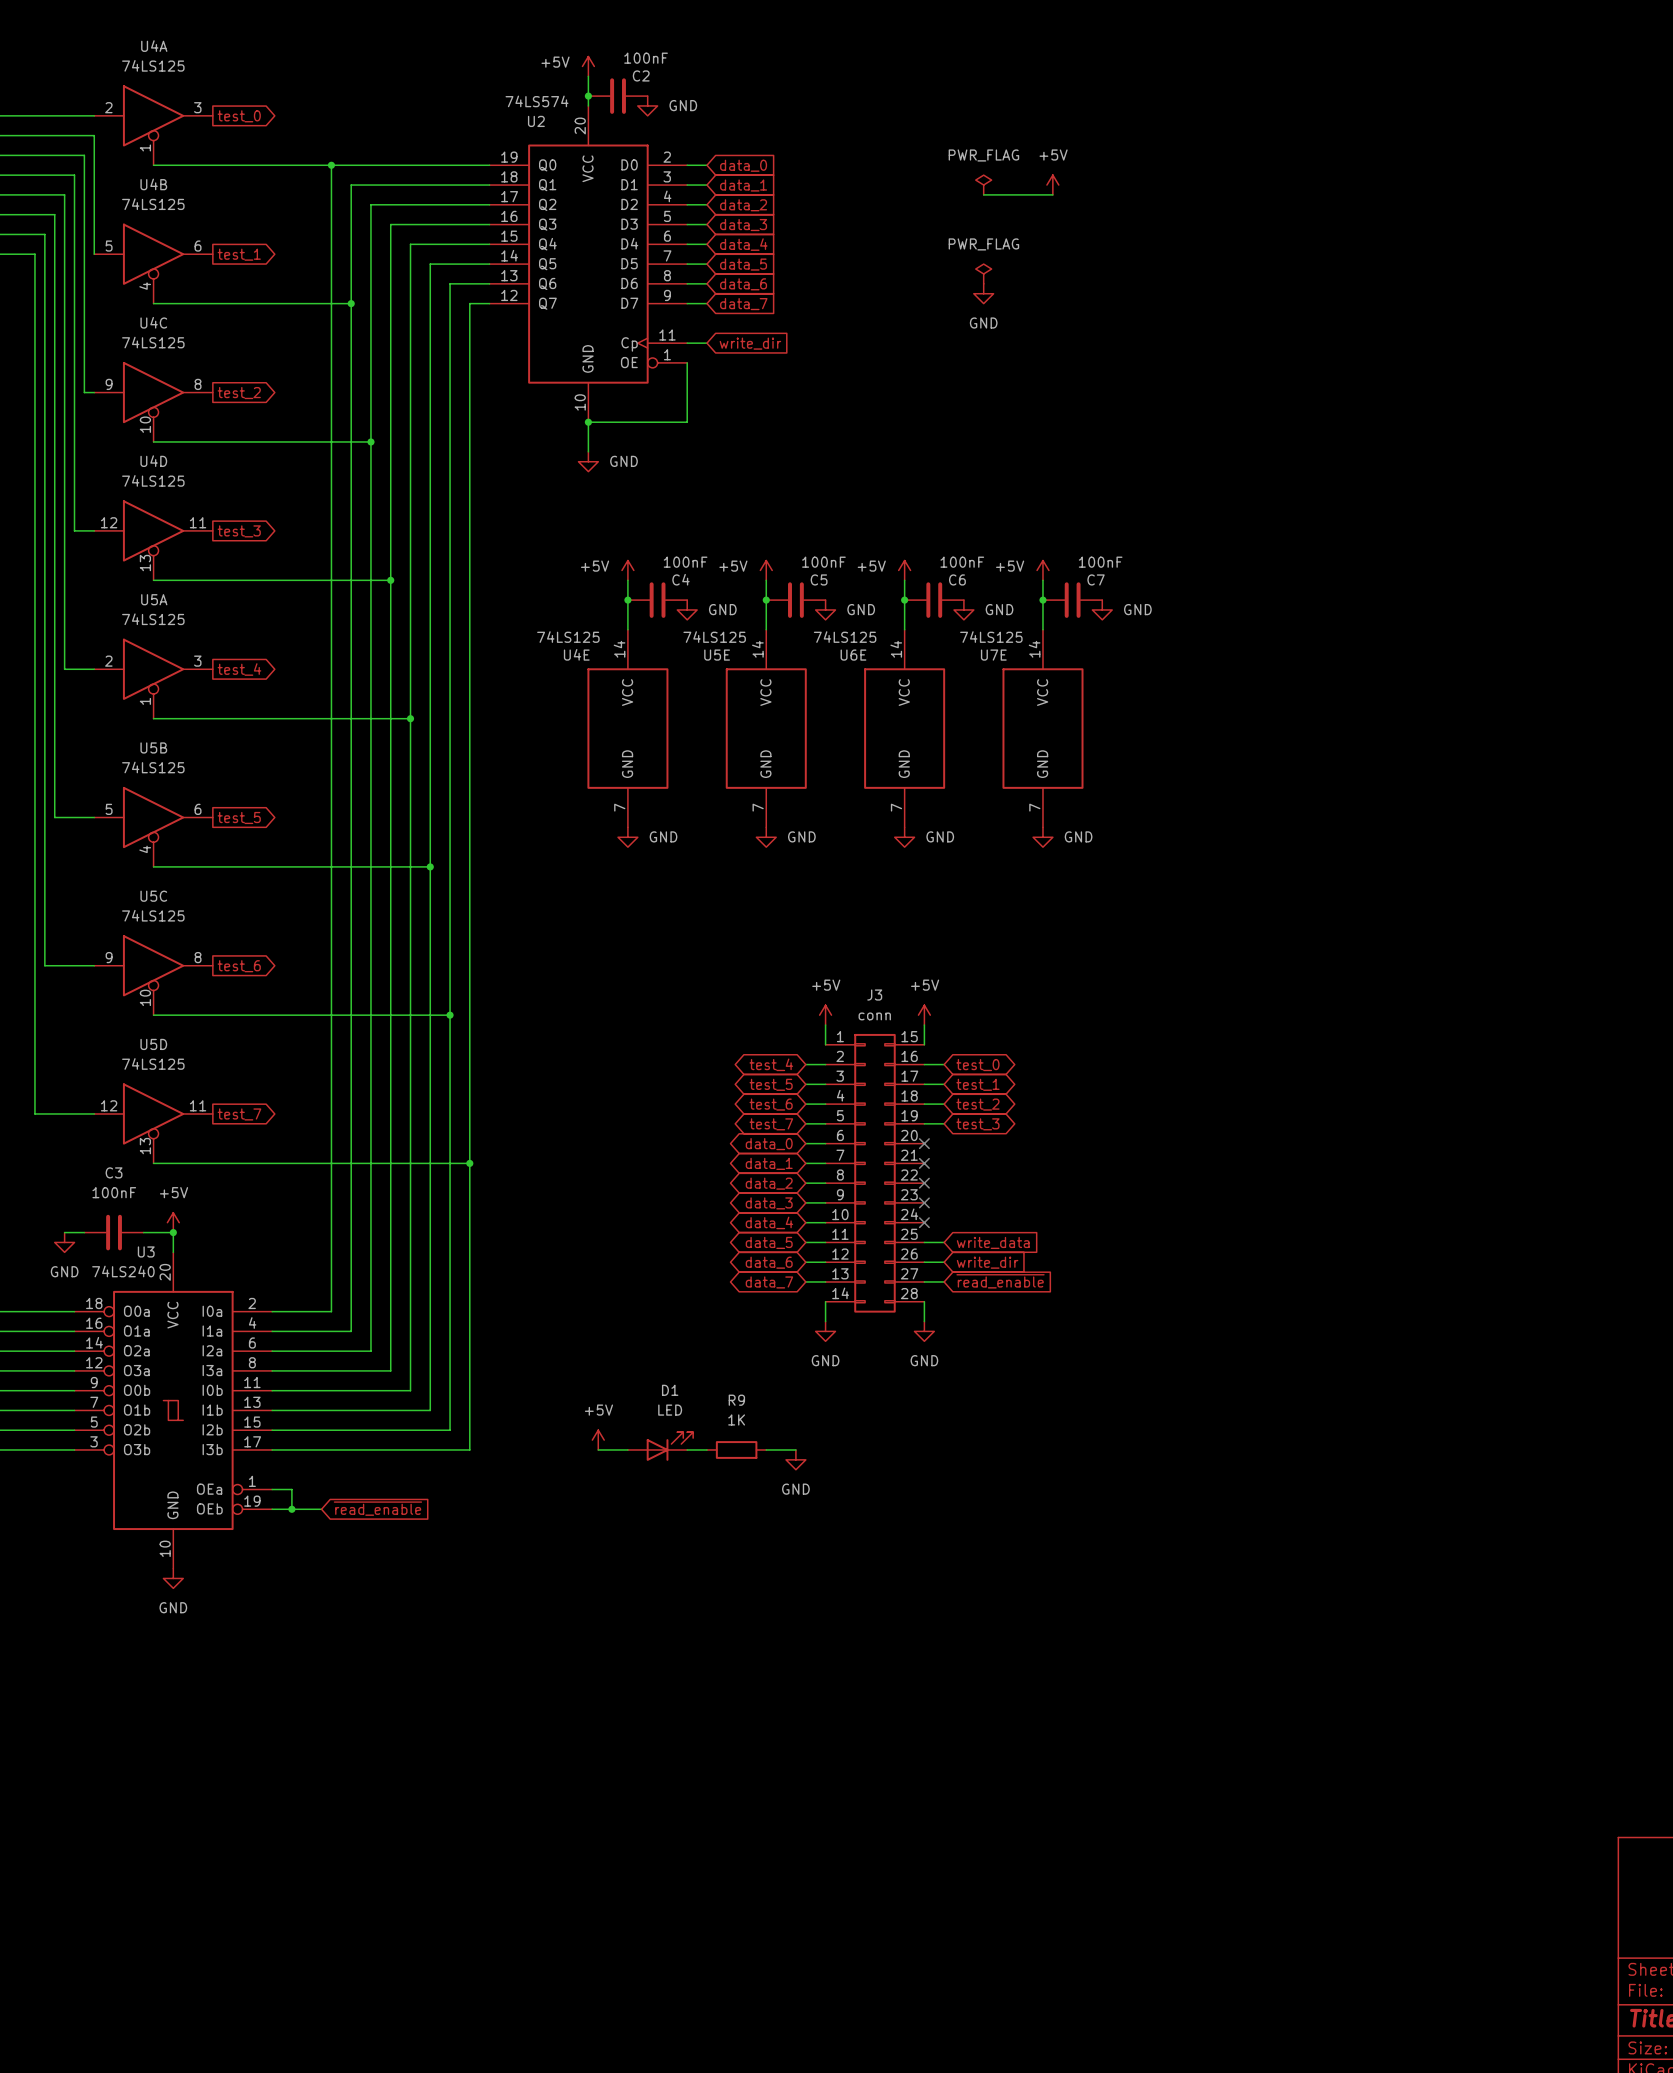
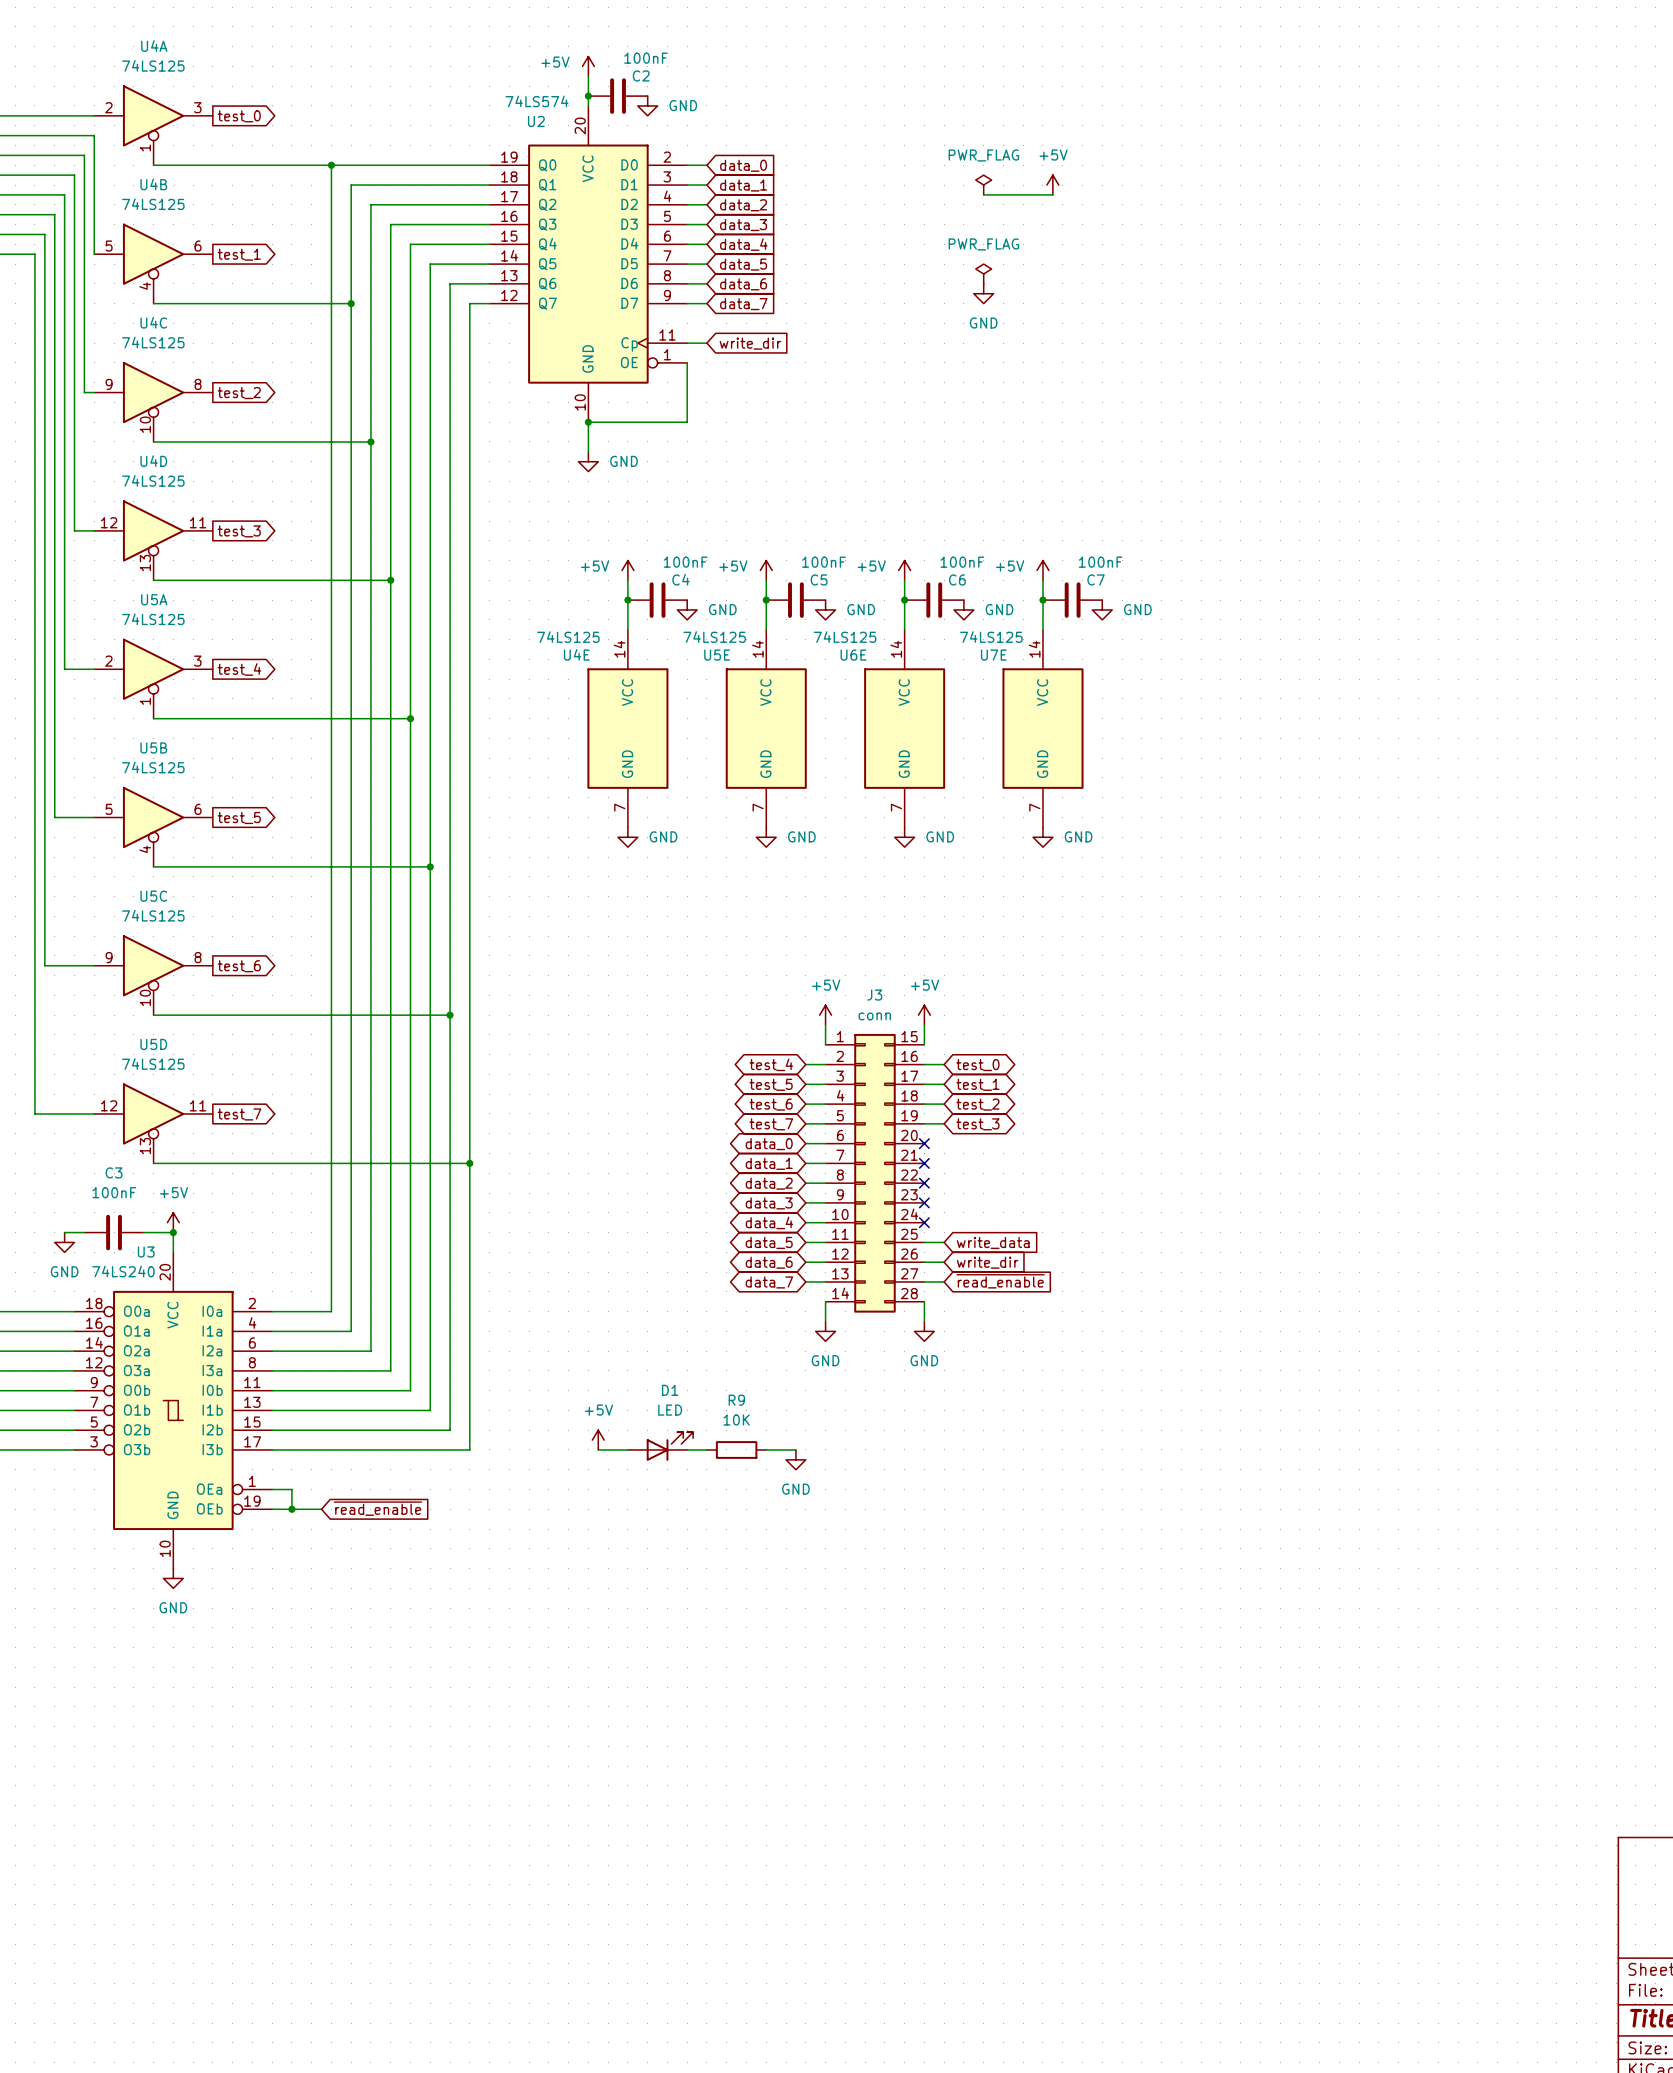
R9 value: 1K (736, 1419) -> 10K (736, 1419)

